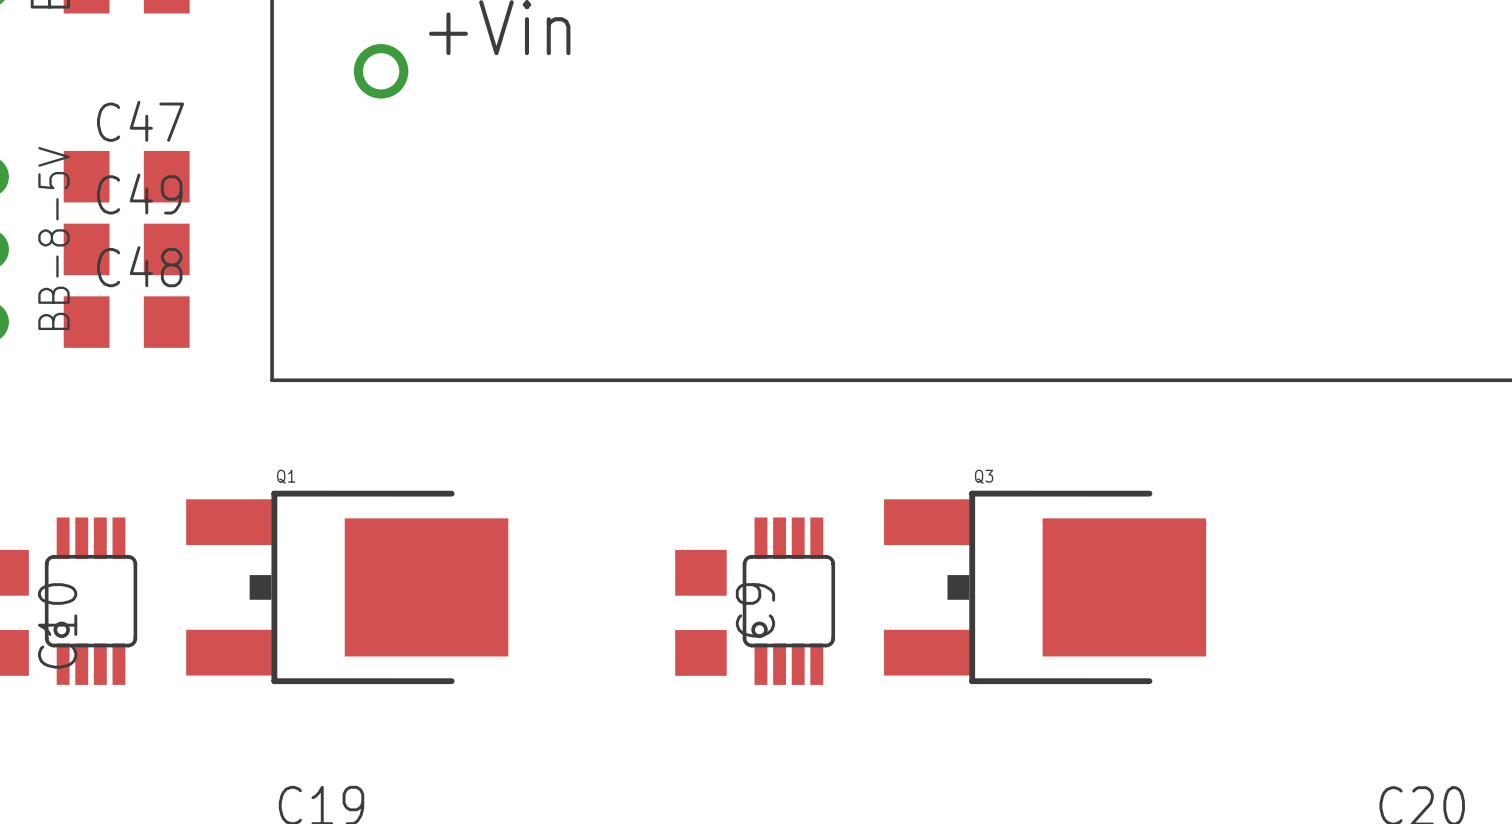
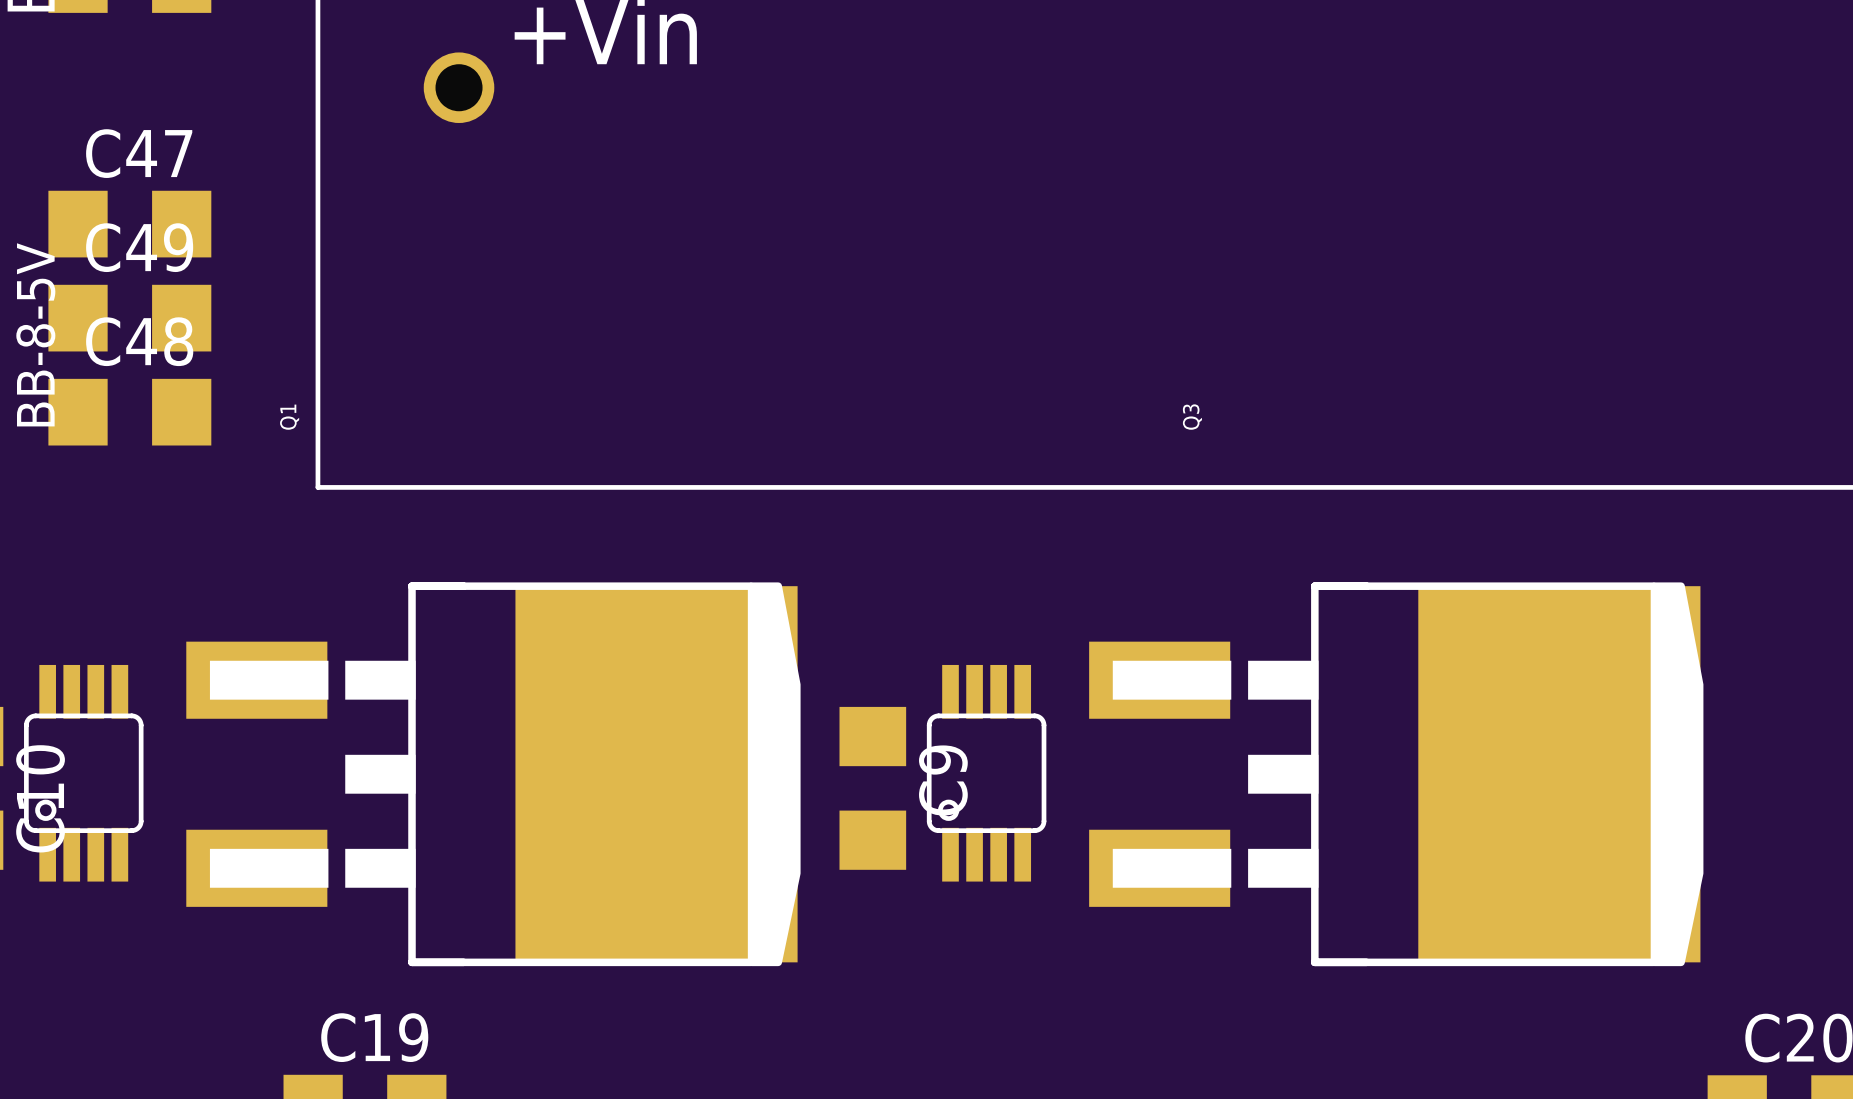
Q1 name position: Q1 (286, 476) -> Q1 (289, 417)
Q3 name position: Q3 (984, 476) -> Q3 (1192, 417)
Q1 footprint: [186, 490, 509, 685] -> [186, 582, 801, 967]
Q3 footprint: [884, 490, 1207, 685] -> [1089, 582, 1704, 967]

